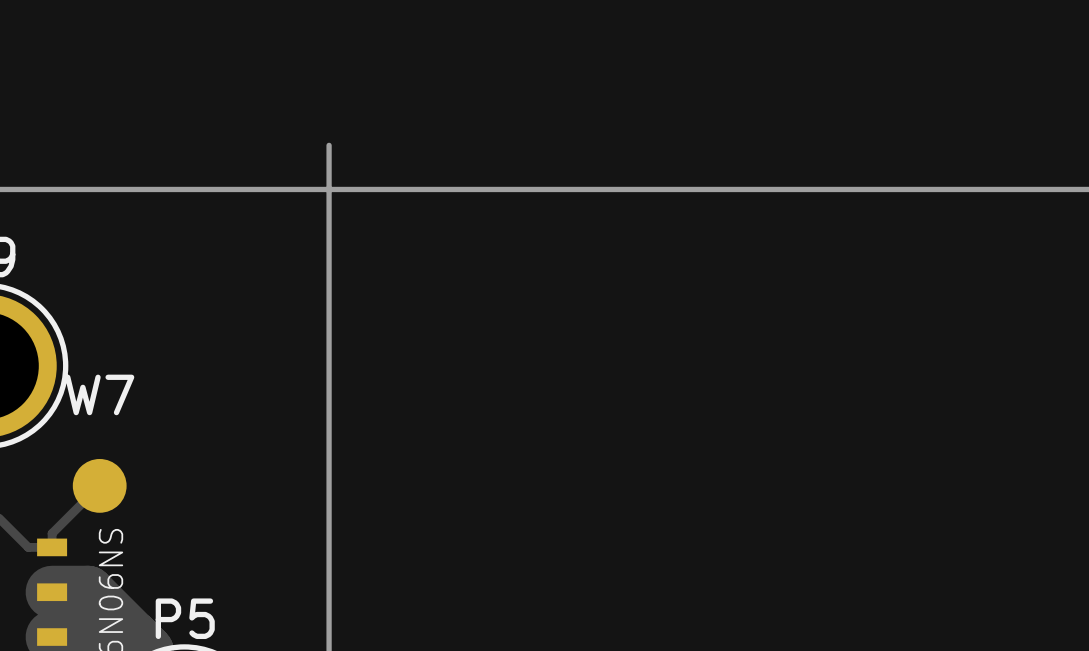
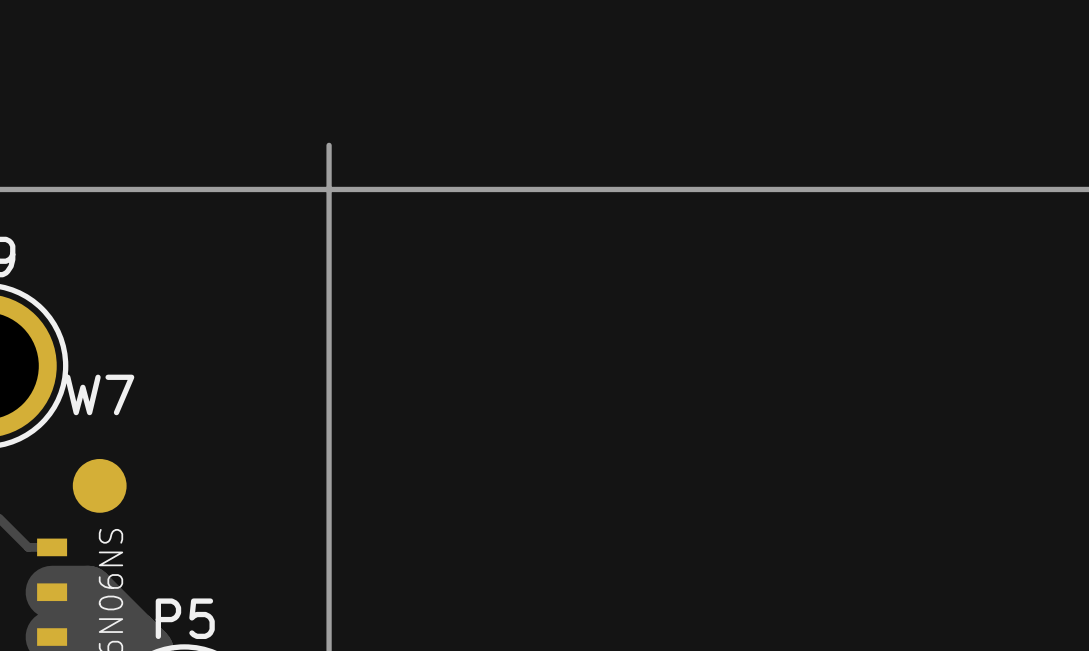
track: (99, 485) (52, 533) (52, 547) -> none

